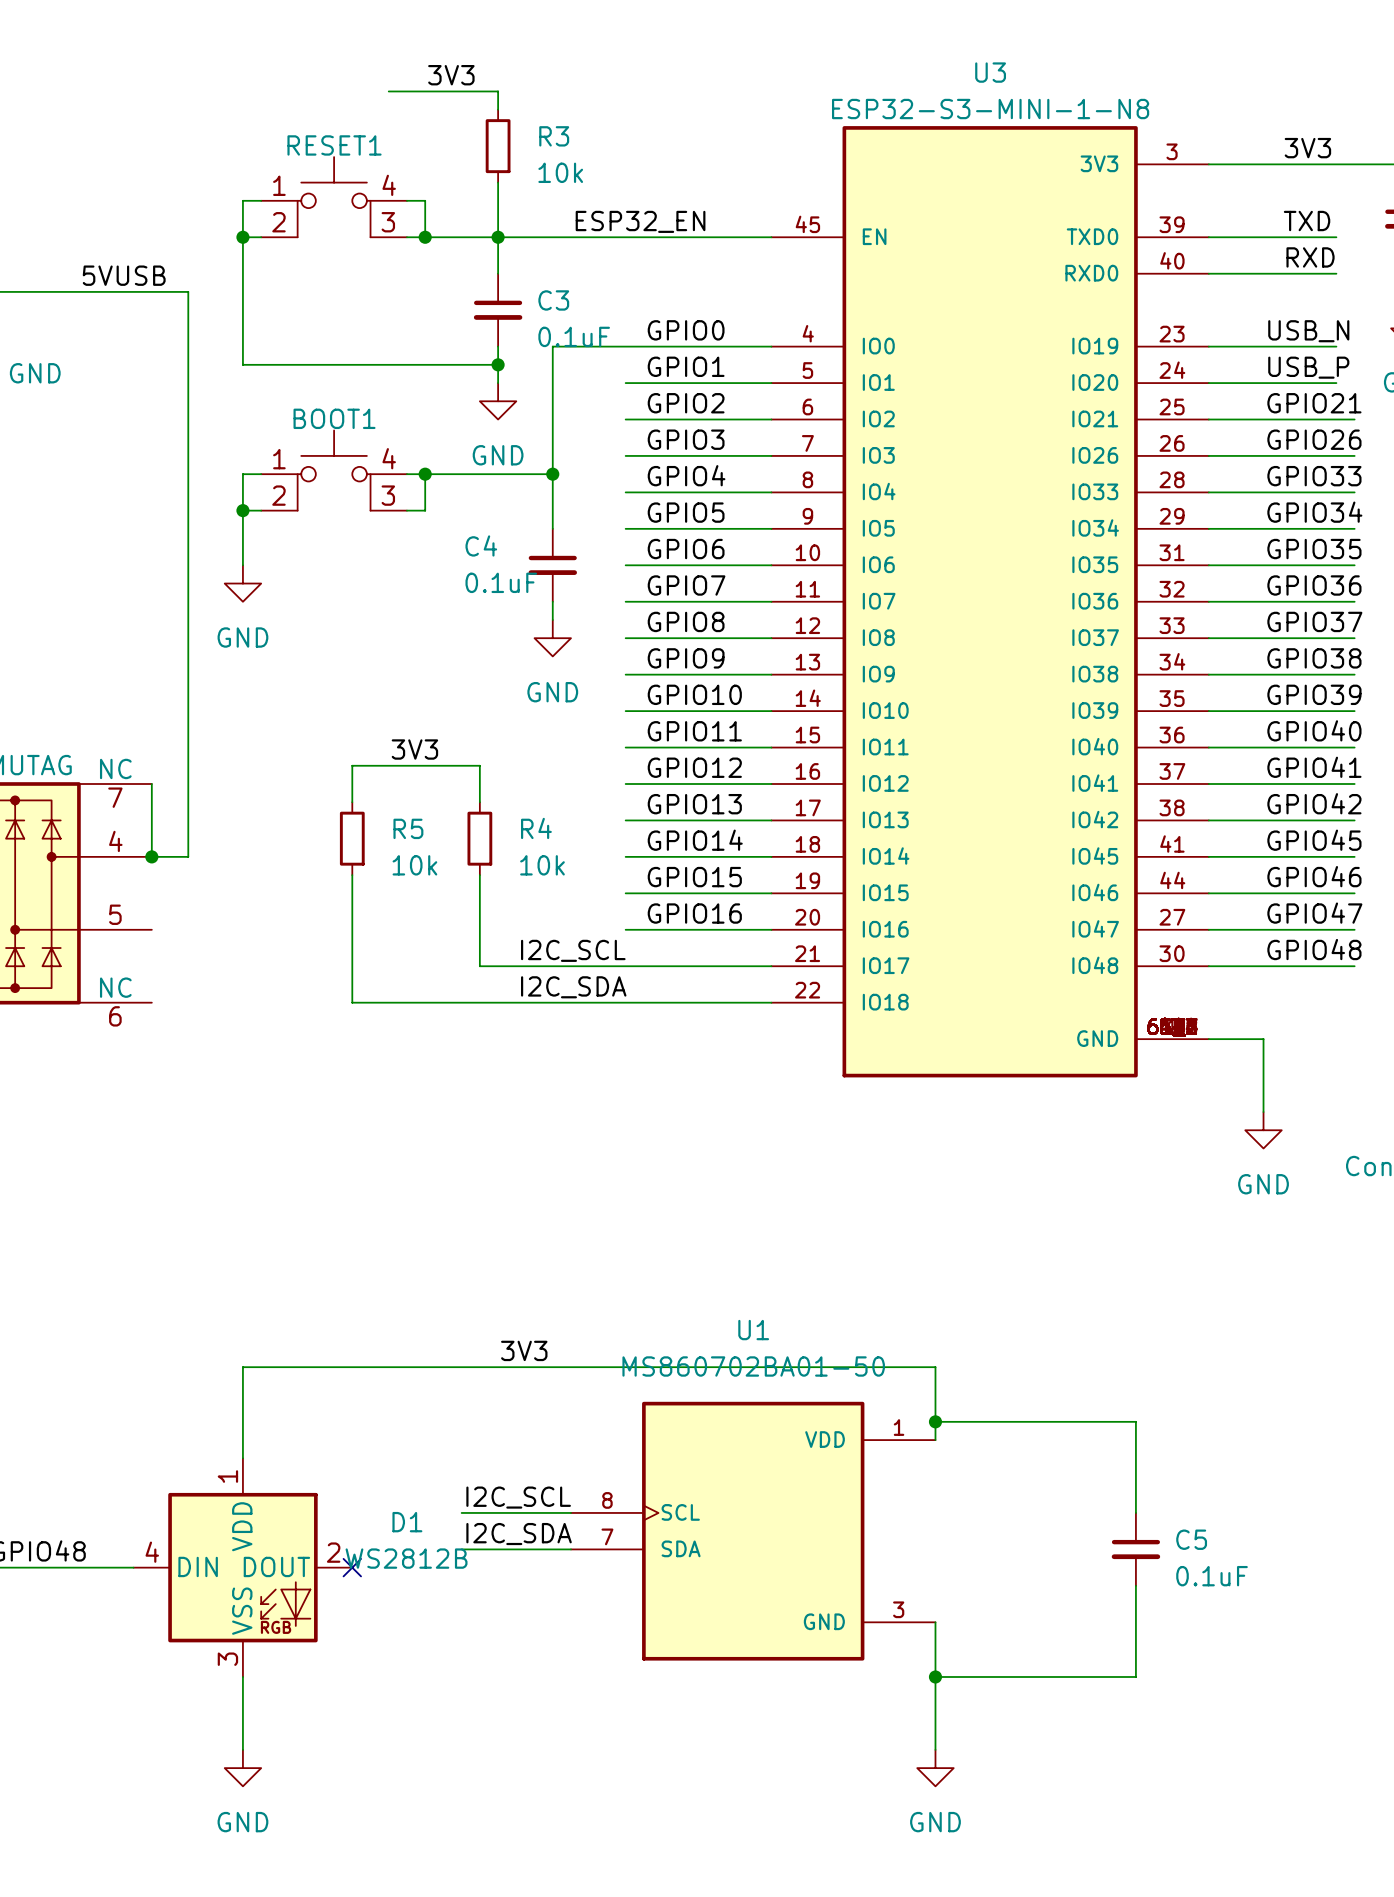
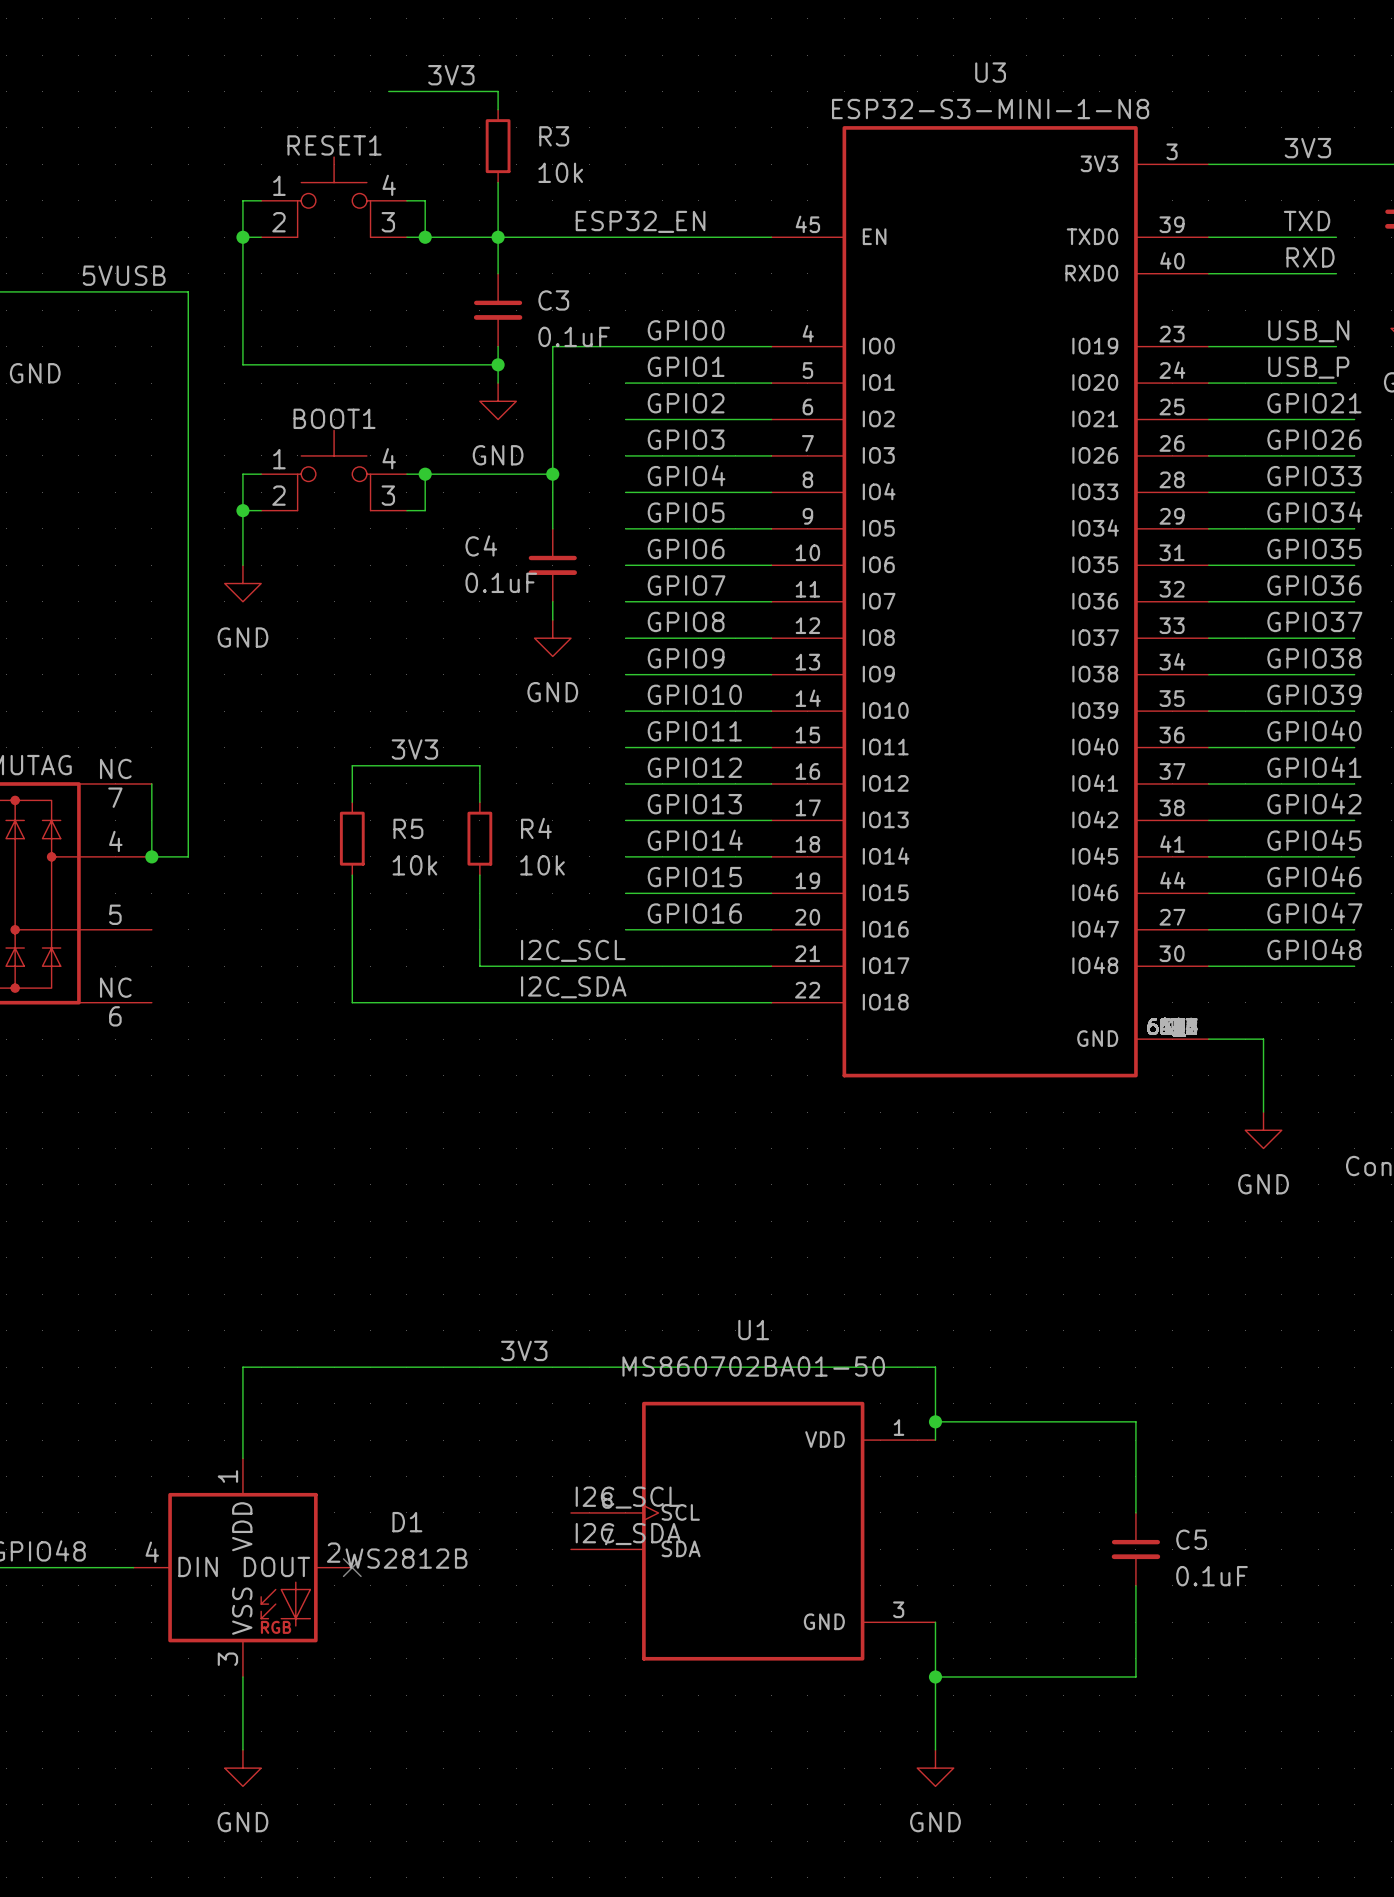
label position: I2C_SCL (518, 1497) -> I2C_SCL (627, 1497)
wire: (461, 1512) (570, 1512) -> none
label position: I2C_SDA (519, 1534) -> I2C_SDA (628, 1534)
wire: (461, 1549) (570, 1549) -> none

